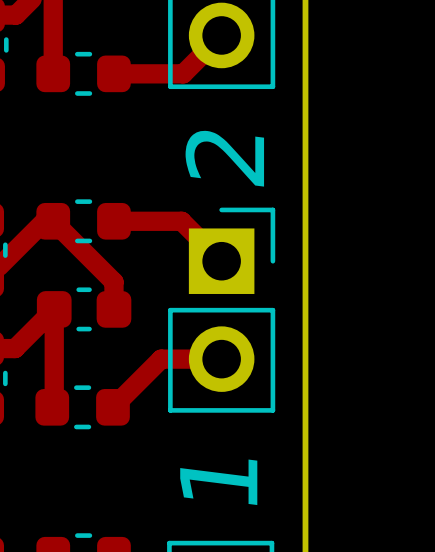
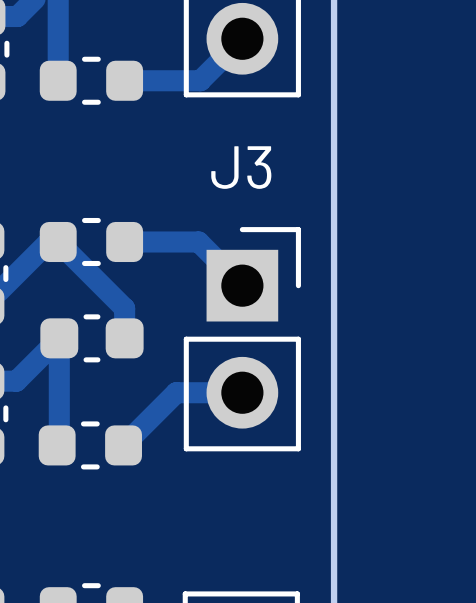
J3 name: none -> J3 (241, 167)
text: 2 (224, 158) -> none
text: 1 (218, 482) -> none

